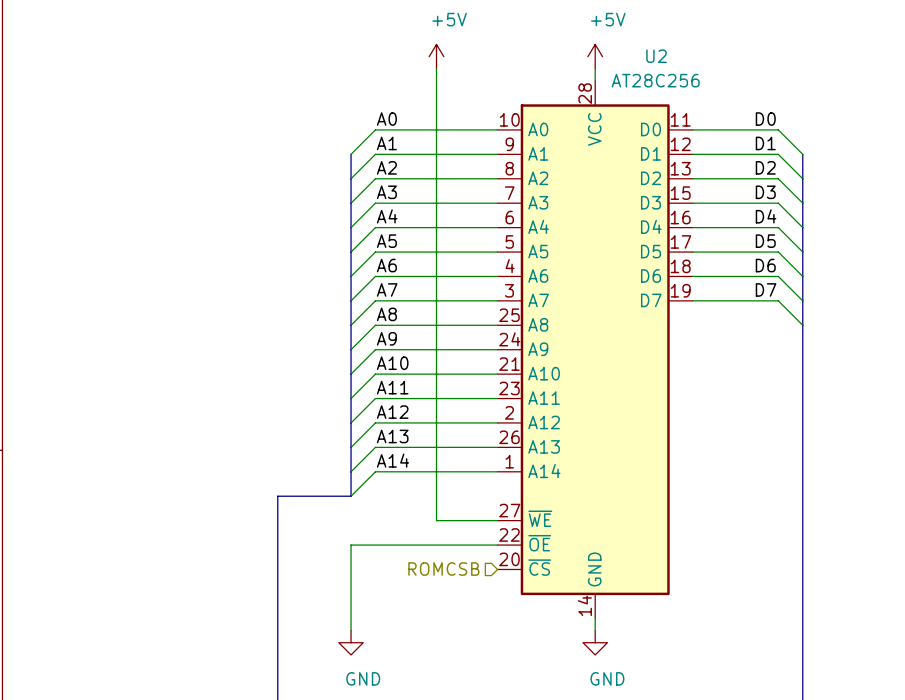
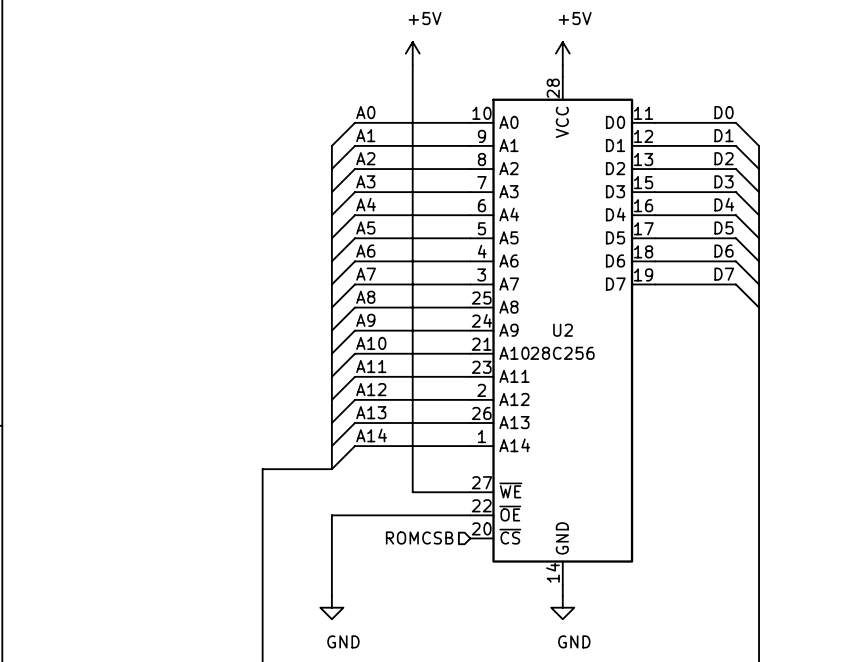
U2 name position: U2 (656, 56) -> U2 (563, 330)
U2 value: AT28C256 (655, 80) -> 28C256 (562, 353)

